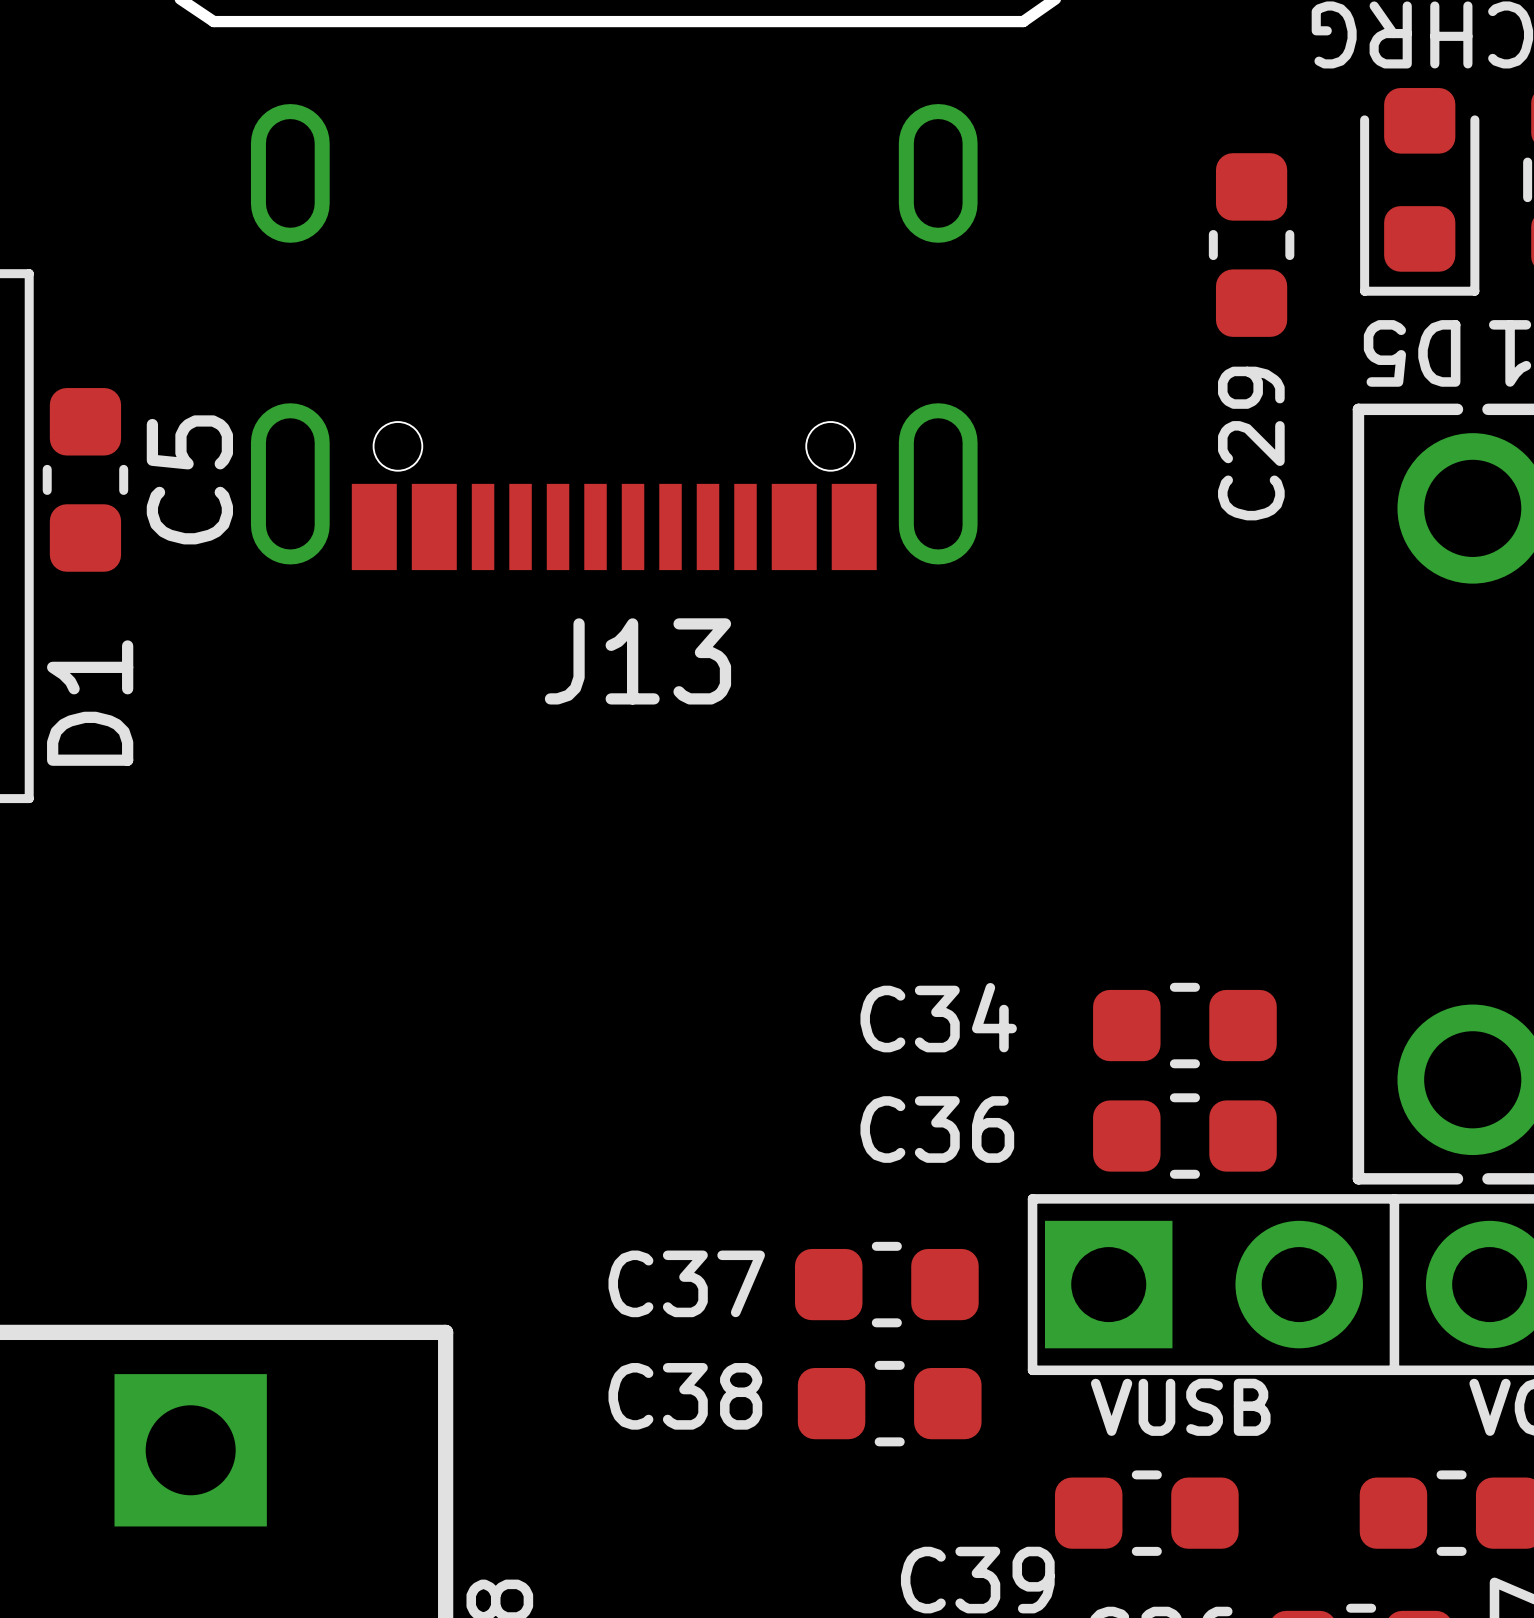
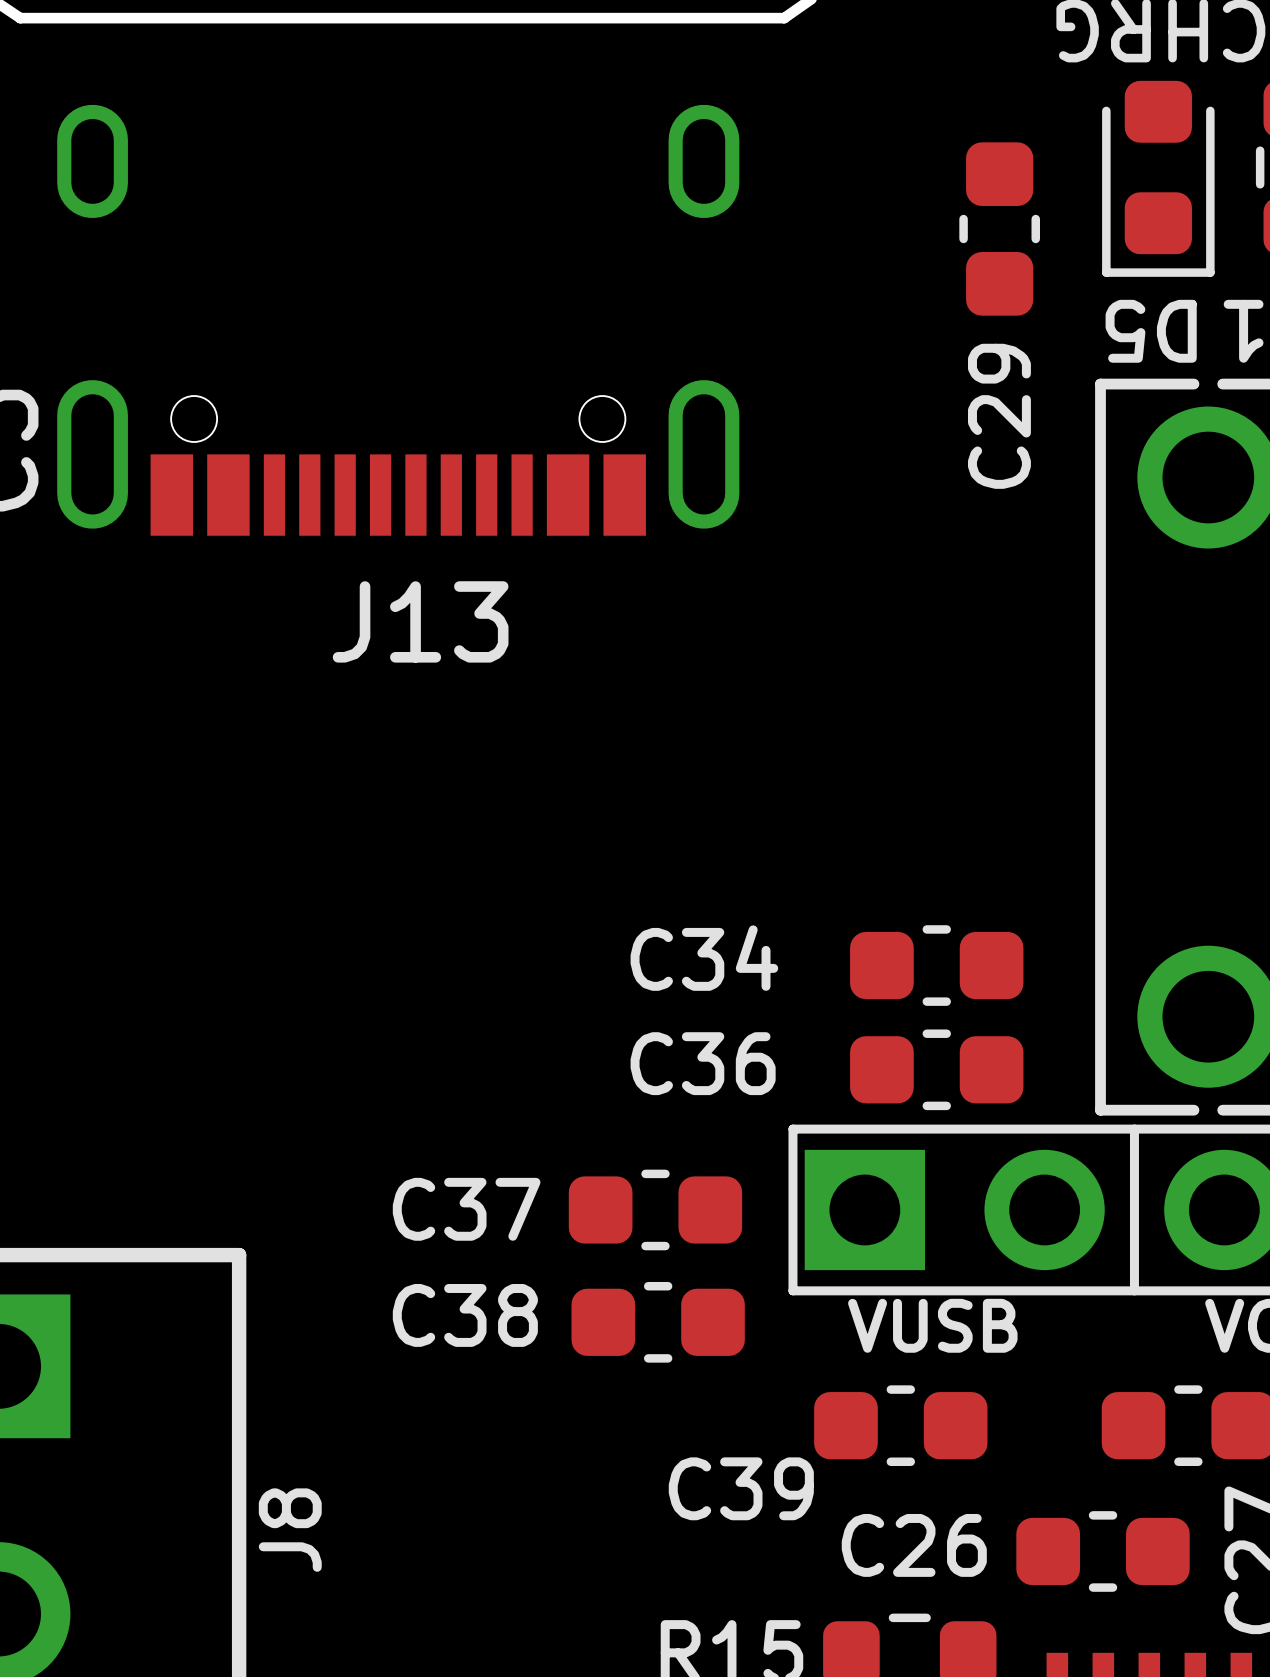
J13 footprint: [250, 104, 978, 571] -> [57, 104, 740, 536]

